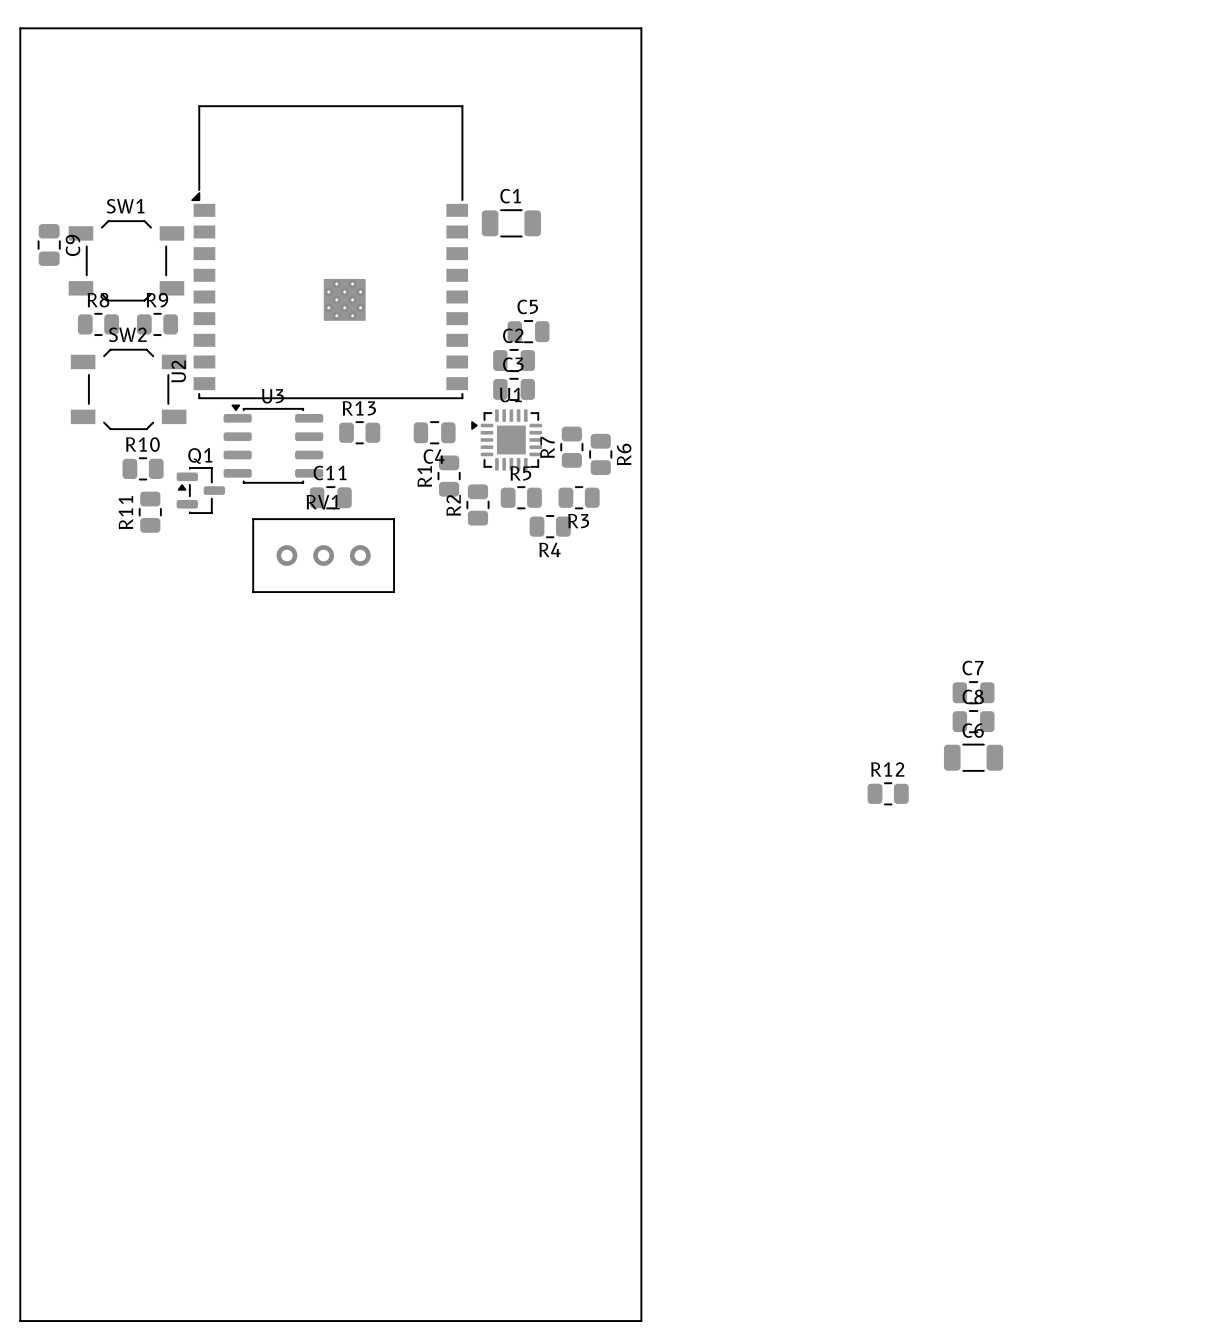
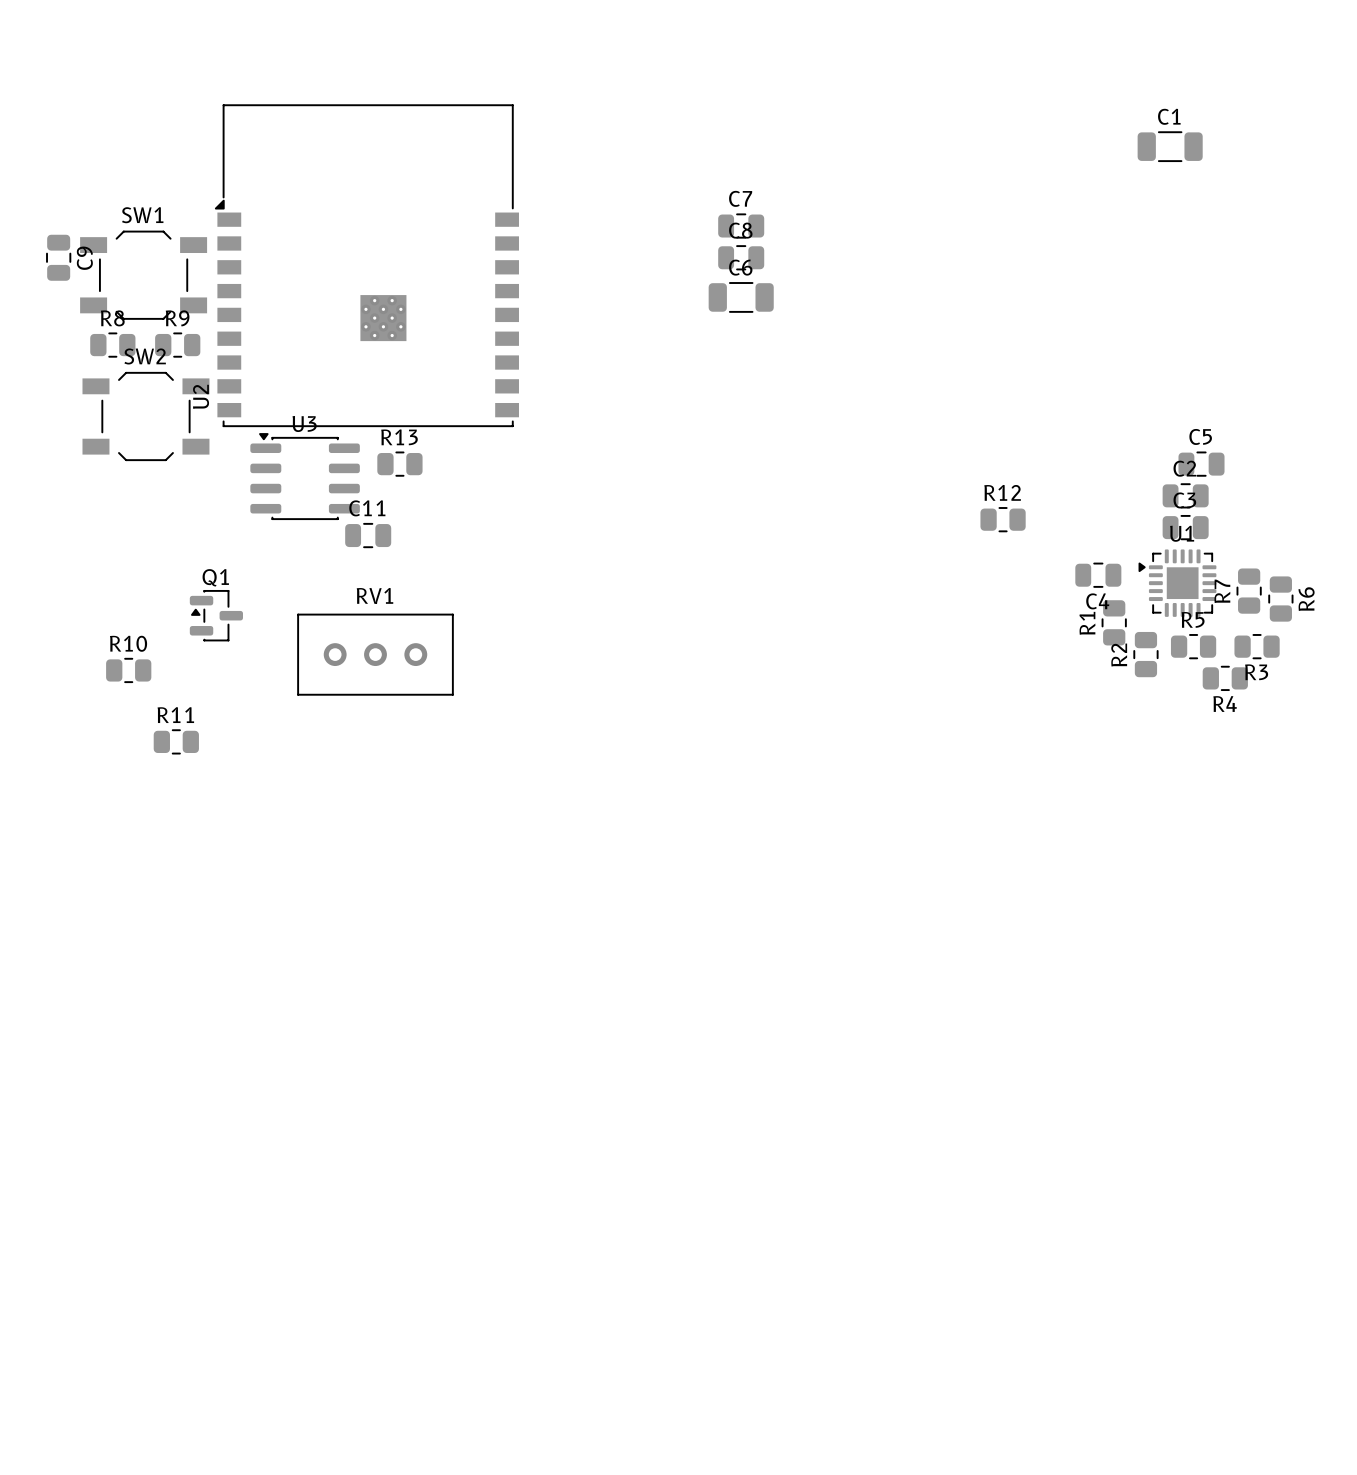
board edge: (20, 28) (641, 28) (641, 1321) (20, 1321) (20, 28) -> none
C1 position: (511, 223) -> (1170, 146)
C5 position: (528, 331) -> (1201, 464)
C2 position: (514, 360) -> (1185, 495)
C3 position: (514, 389) -> (1185, 527)
C4 position: (434, 432) -> (1098, 575)
U1 position: (506, 439) -> (1177, 583)
R7 position: (571, 447) -> (1249, 591)
R6 position: (600, 454) -> (1280, 599)
R10 position: (143, 468) -> (128, 670)
R1 position: (449, 476) -> (1114, 622)
Q1 position: (200, 490) -> (216, 615)
R5 position: (521, 497) -> (1193, 646)
R3 position: (579, 497) -> (1257, 646)
R2 position: (477, 504) -> (1145, 654)
R11 rotation: 0° (150, 512) -> 90° clockwise (176, 741)
R11 position: (150, 512) -> (176, 741)
R4 position: (550, 526) -> (1225, 678)
RV1 position: (323, 555) -> (375, 654)
C7 position: (973, 692) -> (741, 226)
C8 position: (973, 721) -> (741, 257)
C6 position: (973, 757) -> (741, 297)
R12 position: (888, 793) -> (1003, 519)

